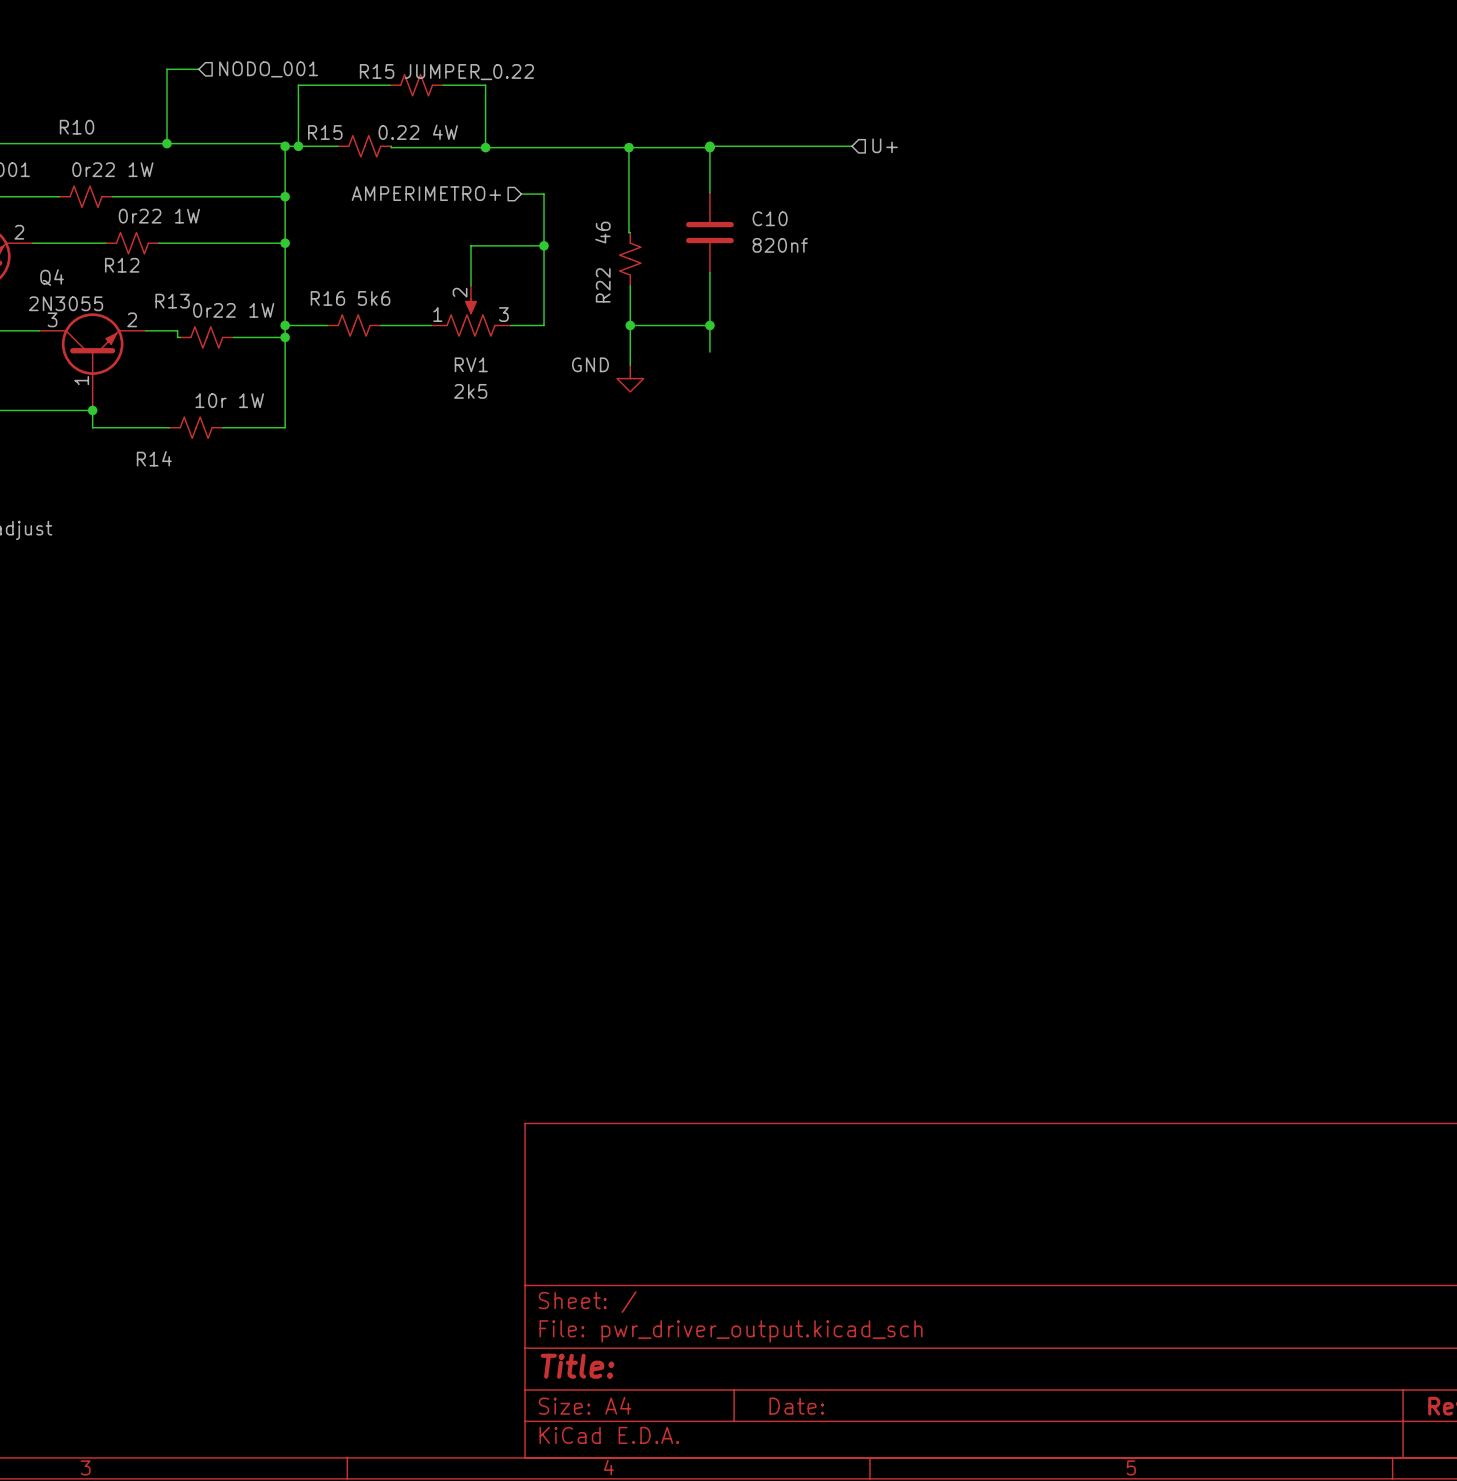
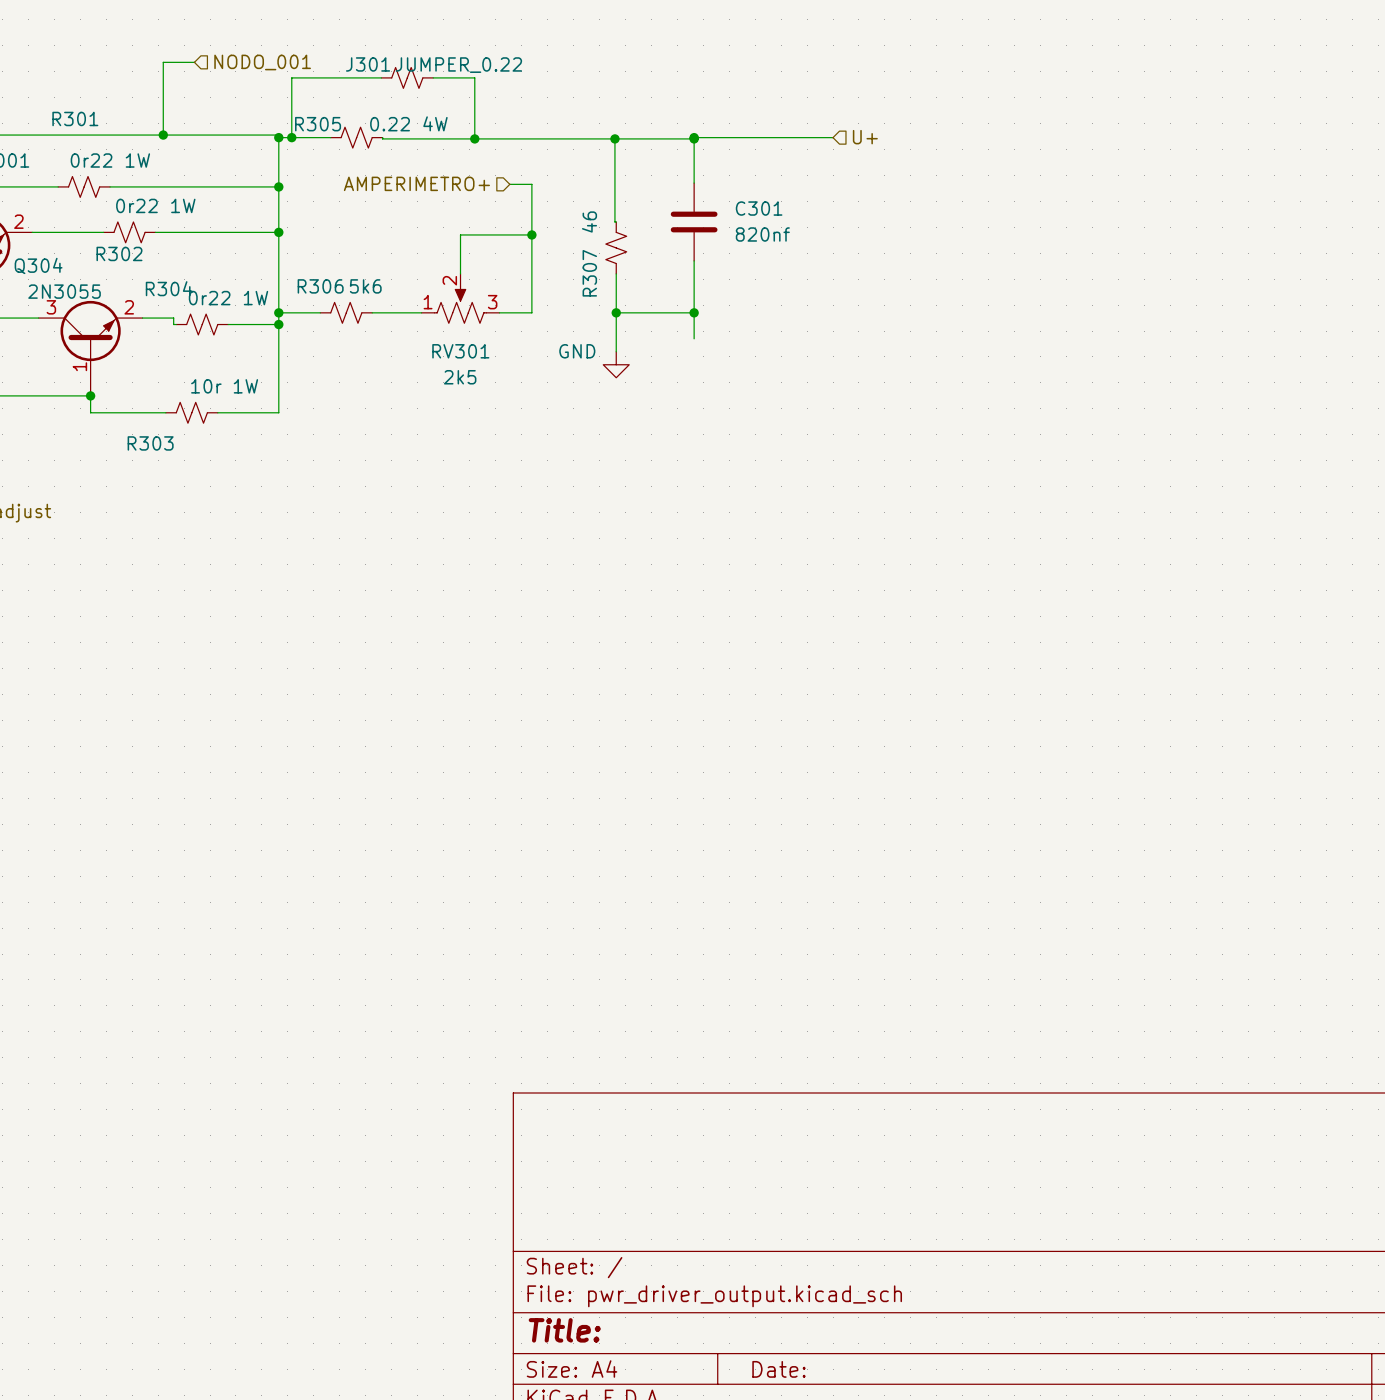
R15 name: R15 (377, 71) -> J301 (368, 64)
R10 name: R10 (77, 127) -> R301 (75, 118)
R15 name: R15 (325, 132) -> R305 (318, 124)
C10 name: C10 (770, 218) -> C301 (759, 208)
R12 name: R12 (122, 265) -> R302 (119, 253)
Q4 name: Q4 (52, 277) -> Q304 (38, 265)
R22 name: R22 (603, 285) -> R307 (589, 273)
R16 name: R16 (327, 298) -> R306 (320, 286)
R13 name: R13 (172, 301) -> R304 (169, 288)
RV1 name: RV1 (471, 364) -> RV301 (460, 351)
R14 name: R14 (154, 458) -> R303 (150, 443)

